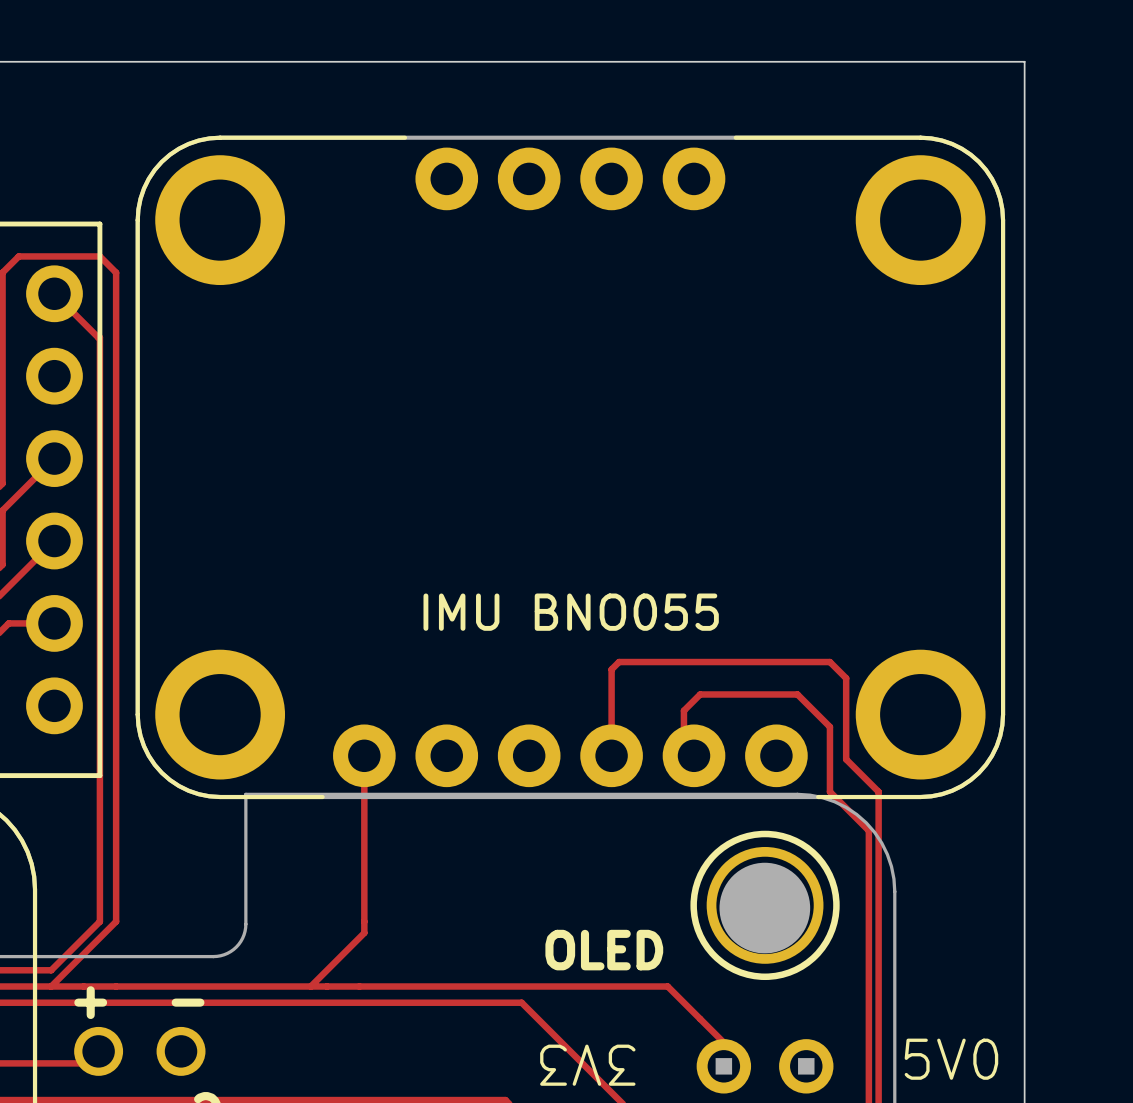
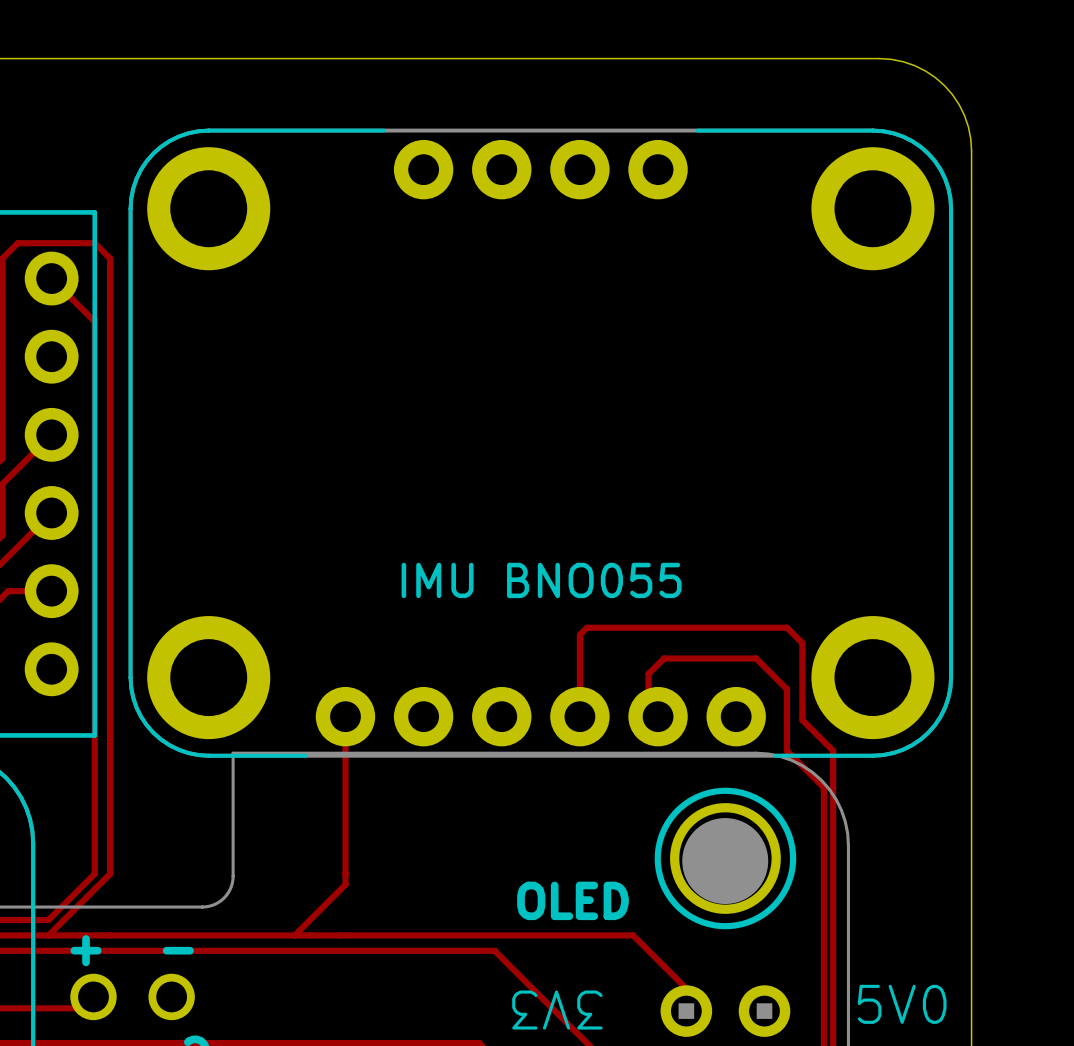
board edge: (927, 61) (1024, 61) (1024, 159) -> (879, 58) (903, 61) (914, 65) (935, 77) (944, 85) (952, 94) (964, 115) (968, 126) (971, 150)

